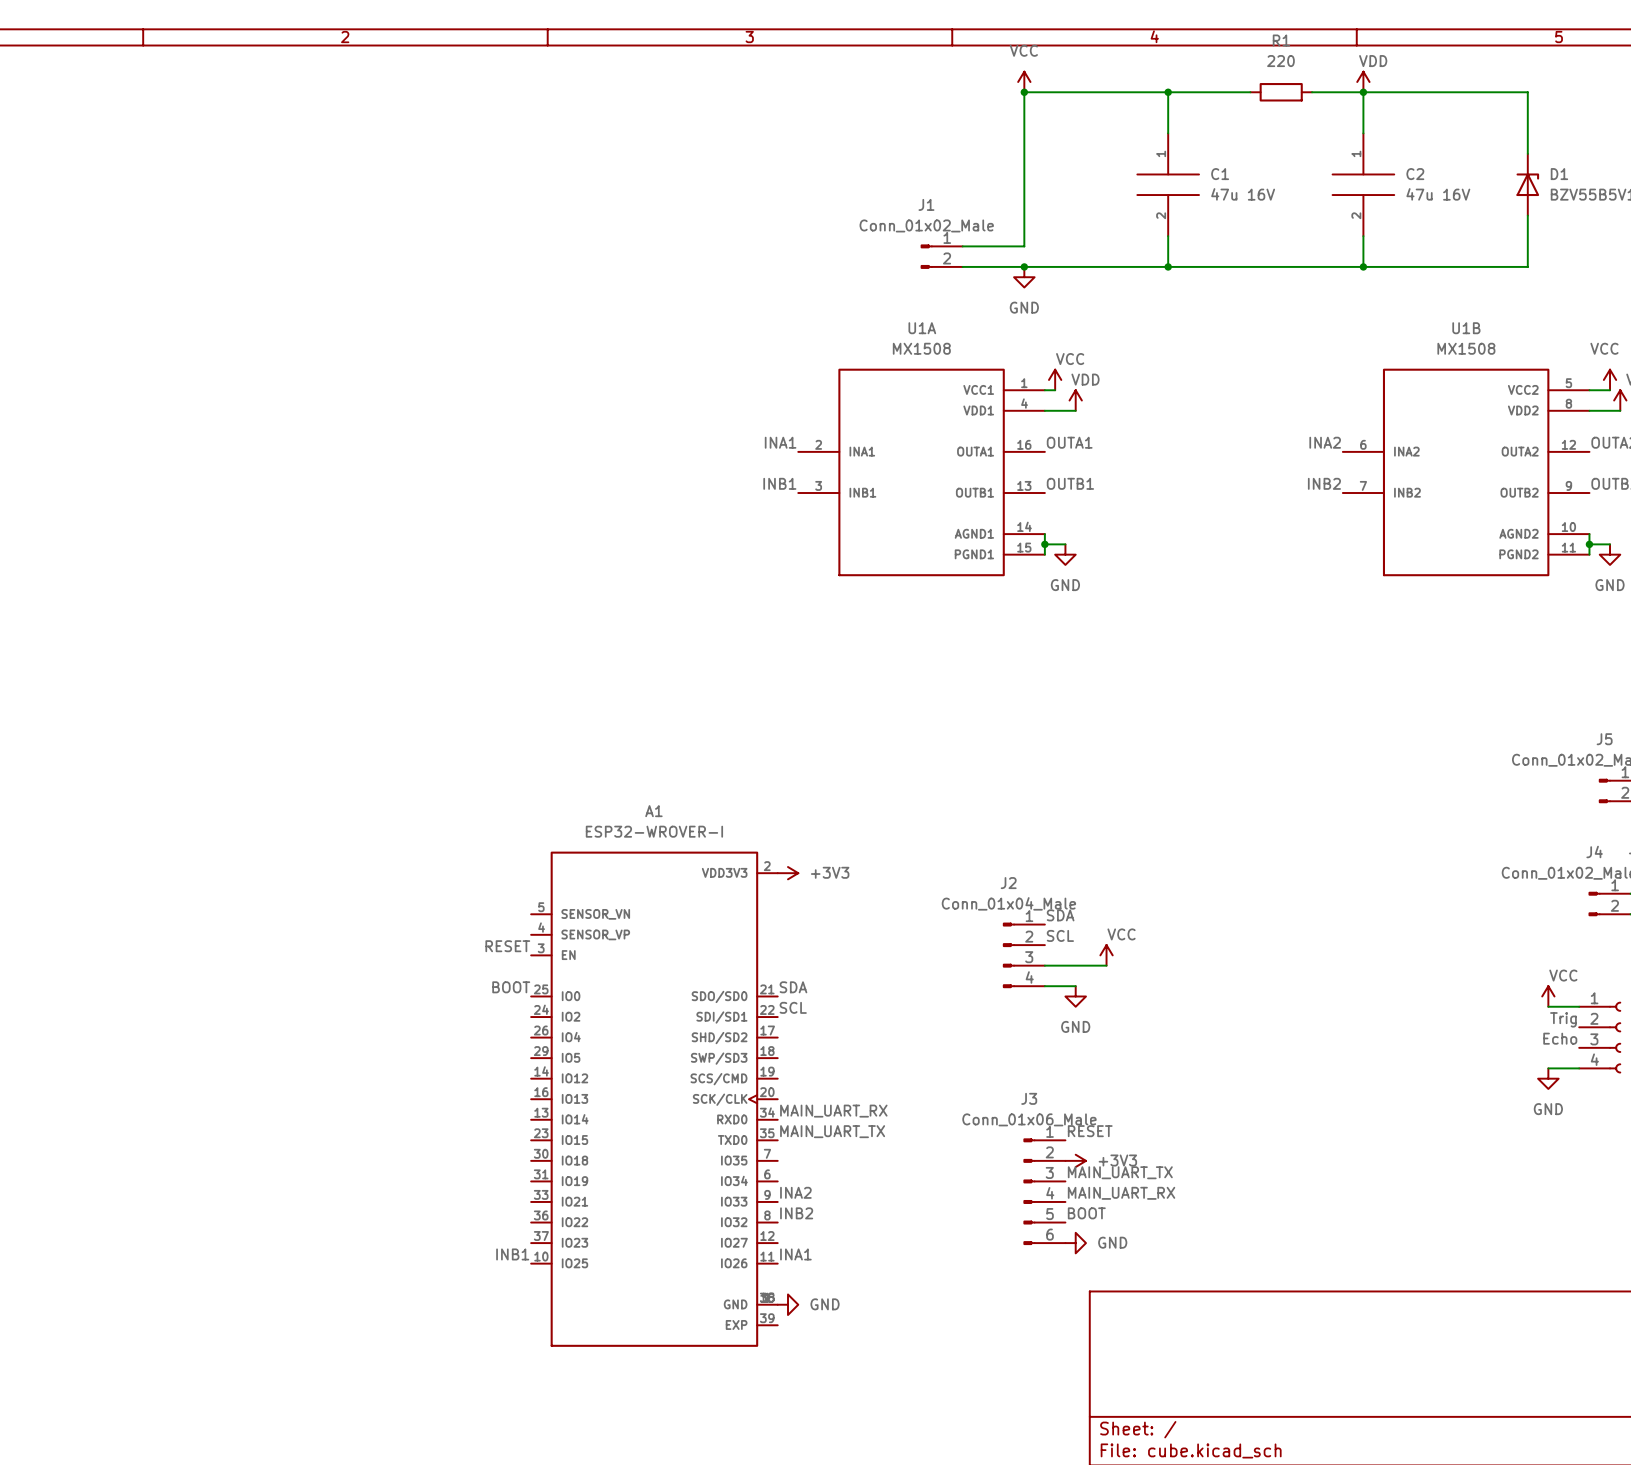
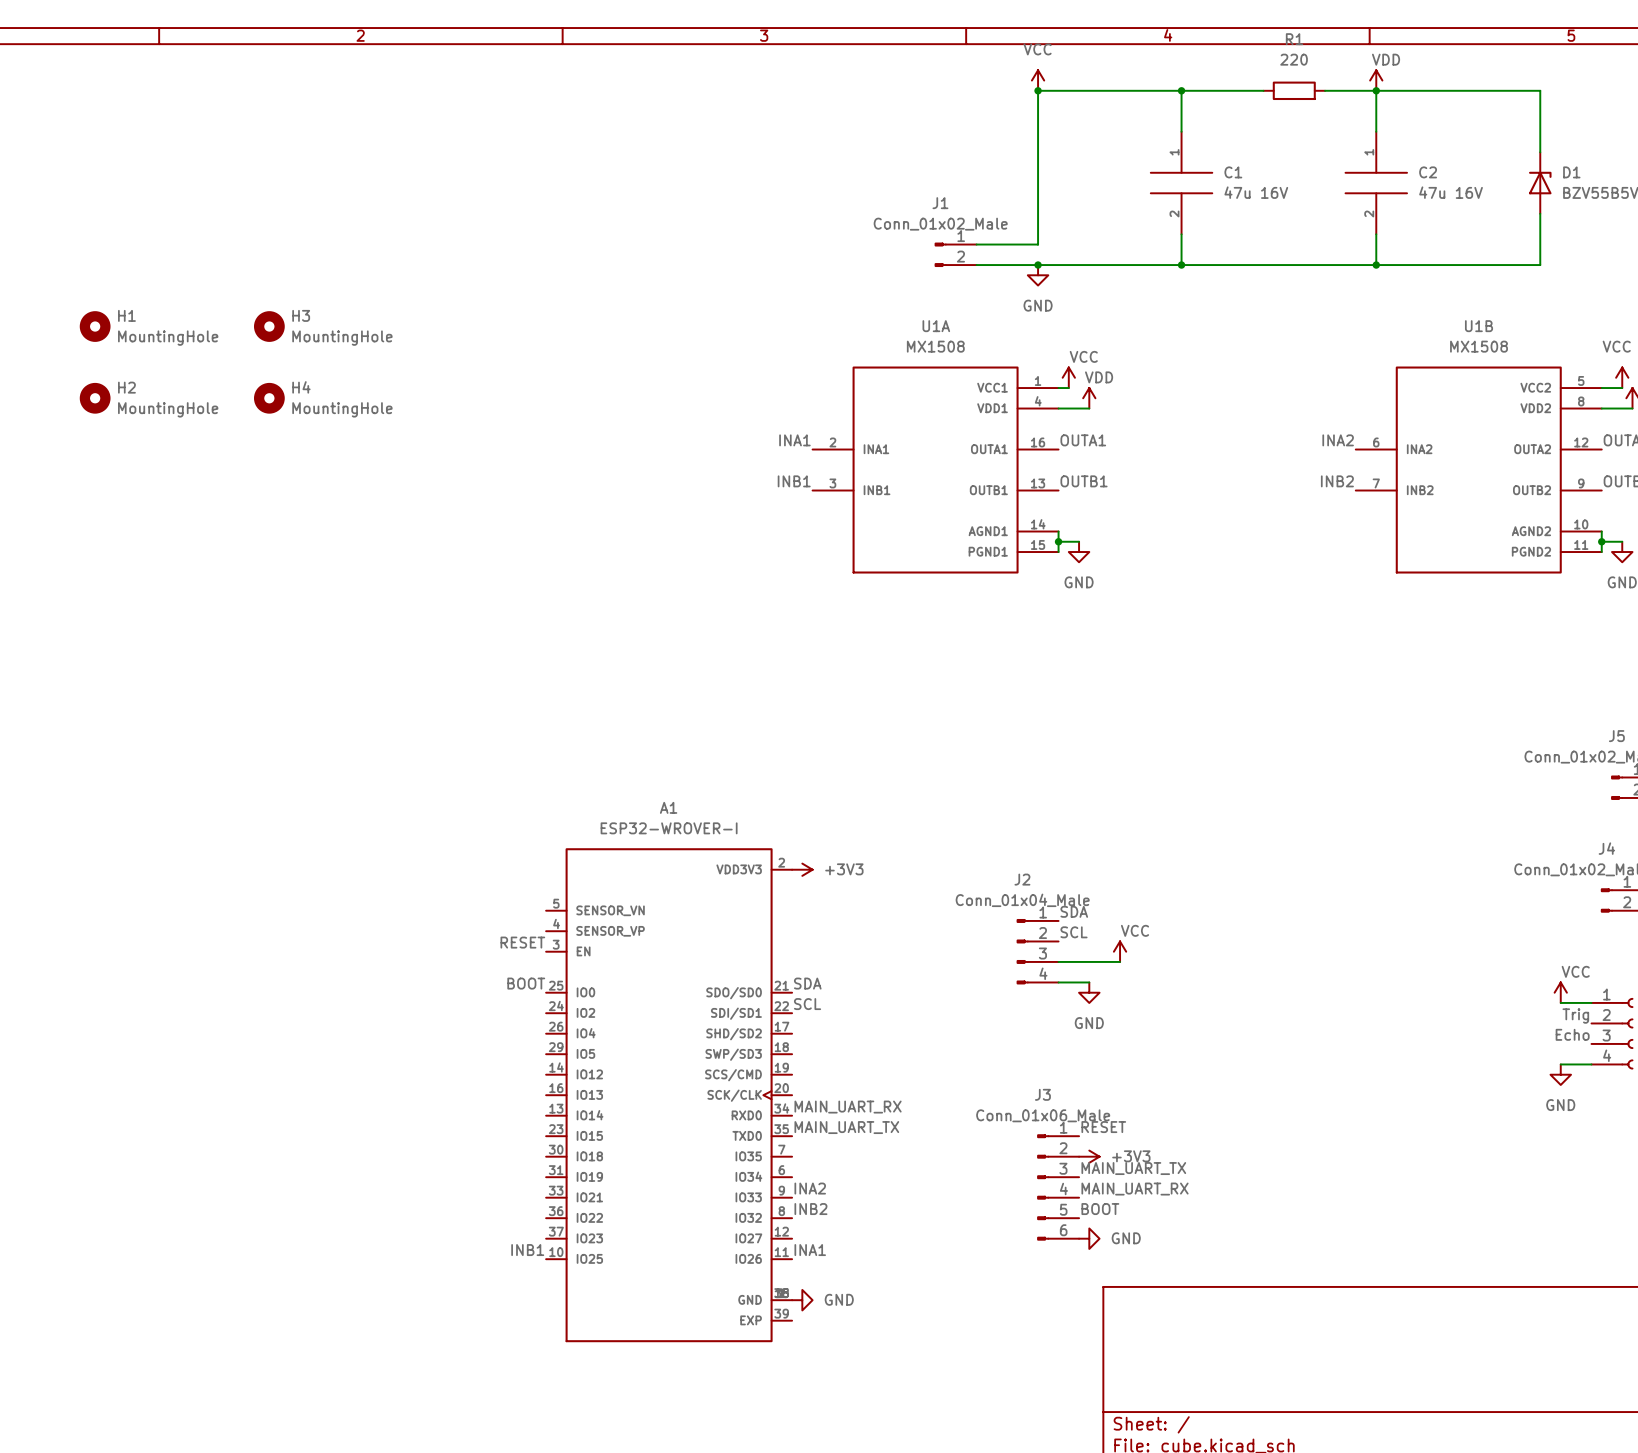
H1: none -> MountingHole (95, 326)
H3: none -> MountingHole (269, 326)
H2: none -> MountingHole (95, 398)
H4: none -> MountingHole (269, 398)

